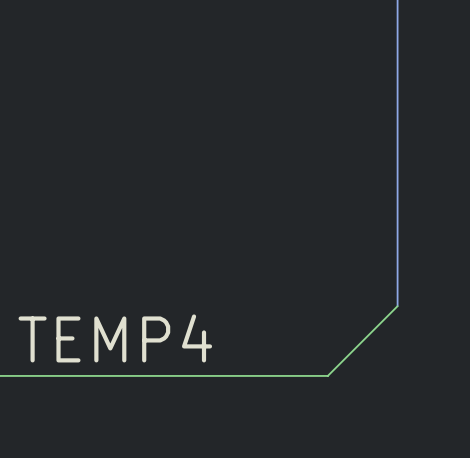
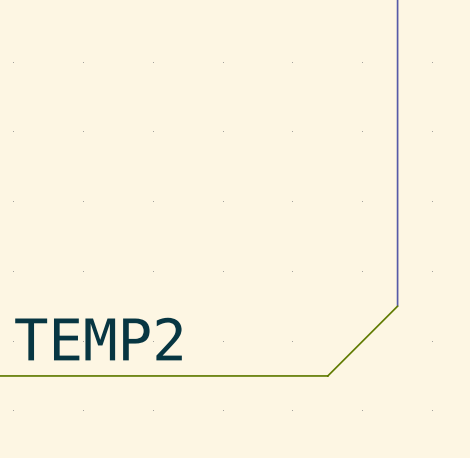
label: TEMP4 (115, 338) -> TEMP2 (98, 339)

